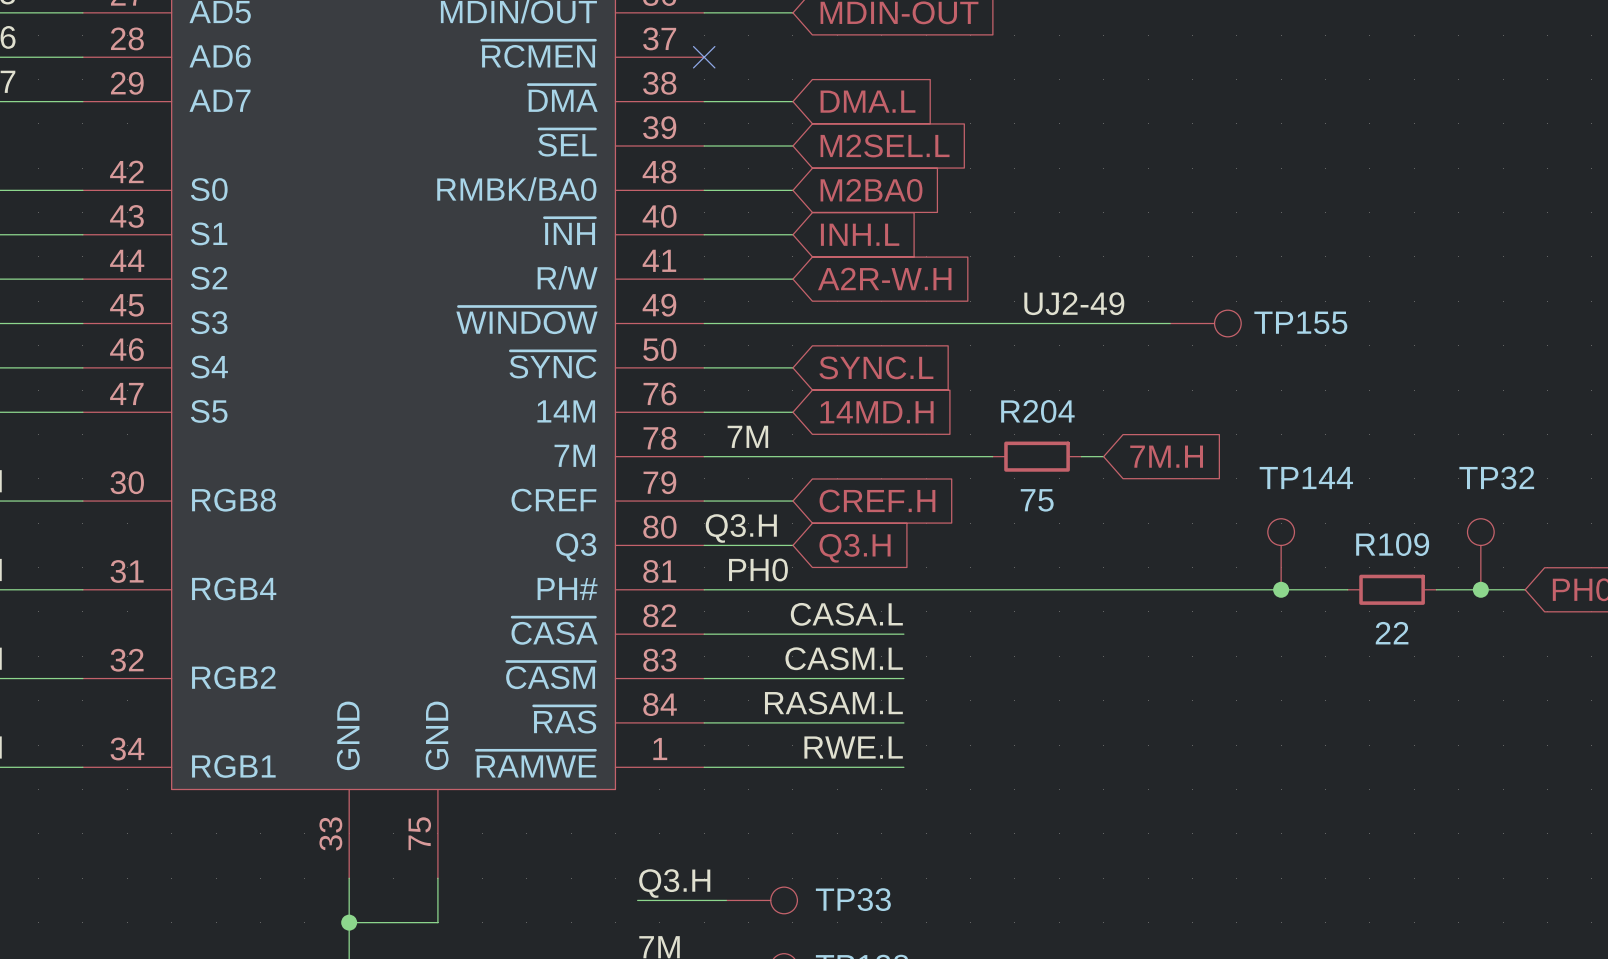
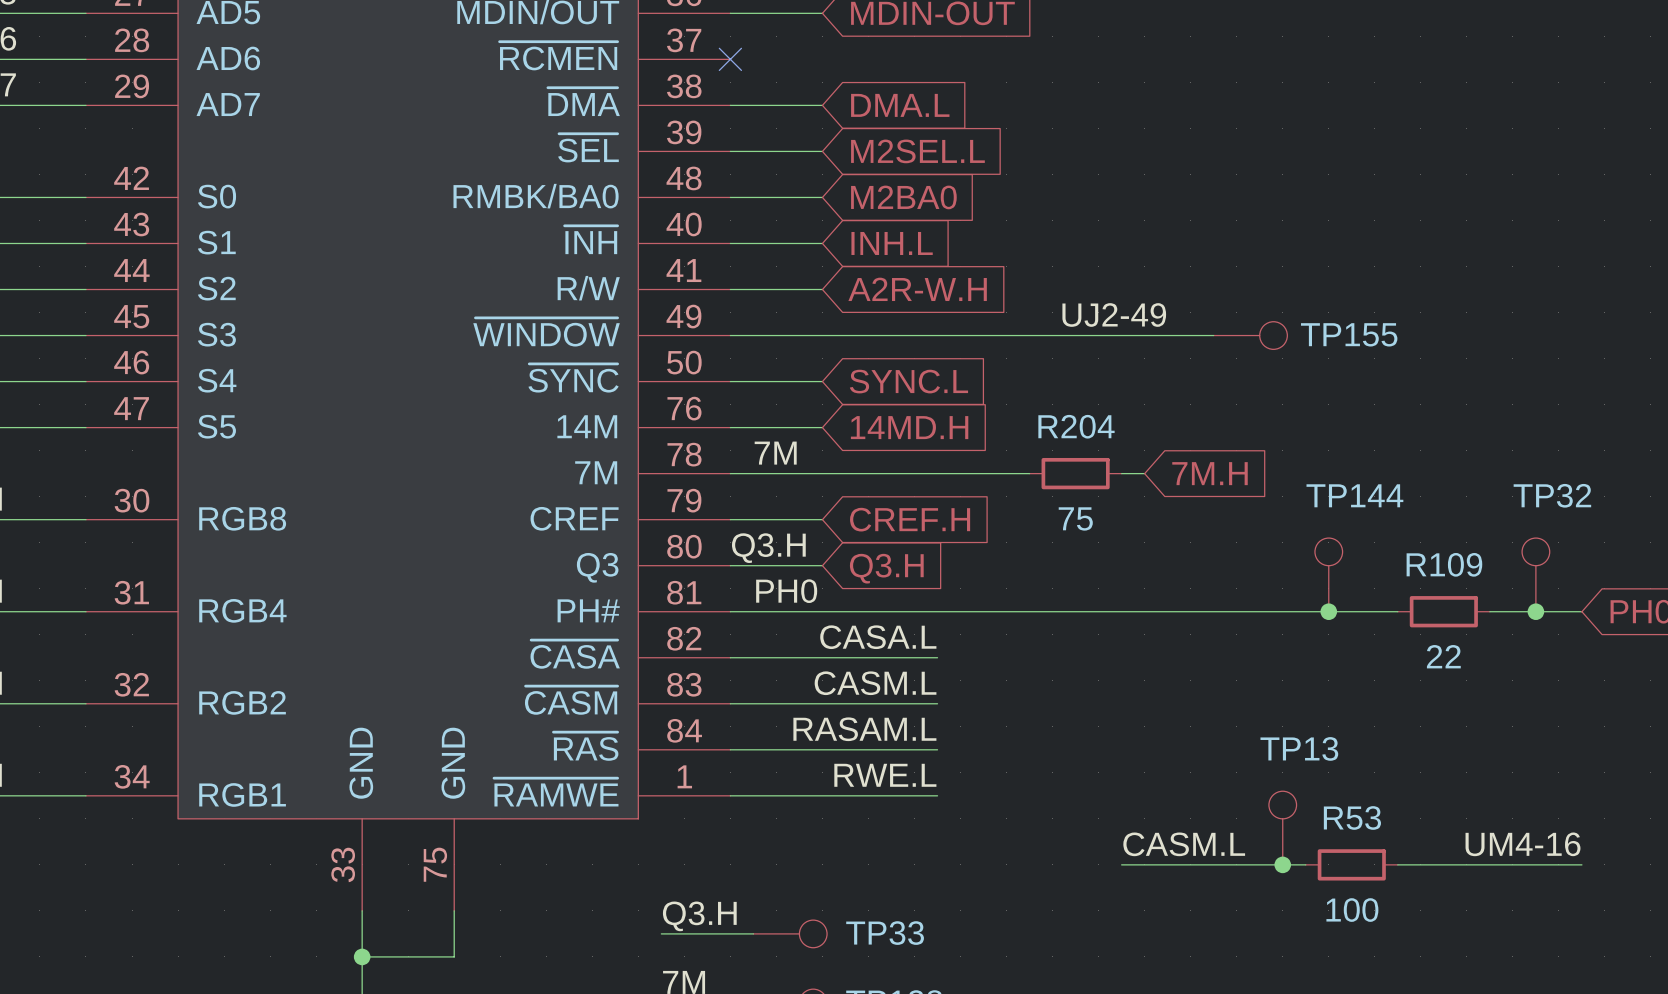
TP13: none -> (1282, 828)
label: none -> CASM.L (1184, 844)
label: none -> UM4-16 (1522, 844)
wire: none -> (1121, 864) (1305, 864)
junction: none -> (1282, 864)
R53: none -> 100 (1351, 864)
wire: none -> (1397, 864) (1581, 864)

